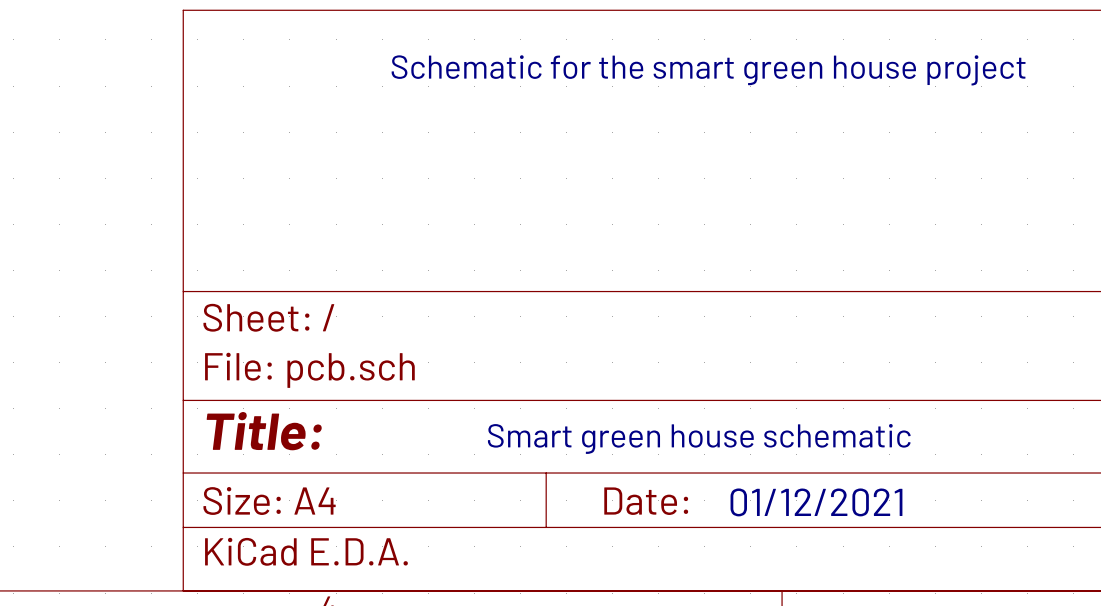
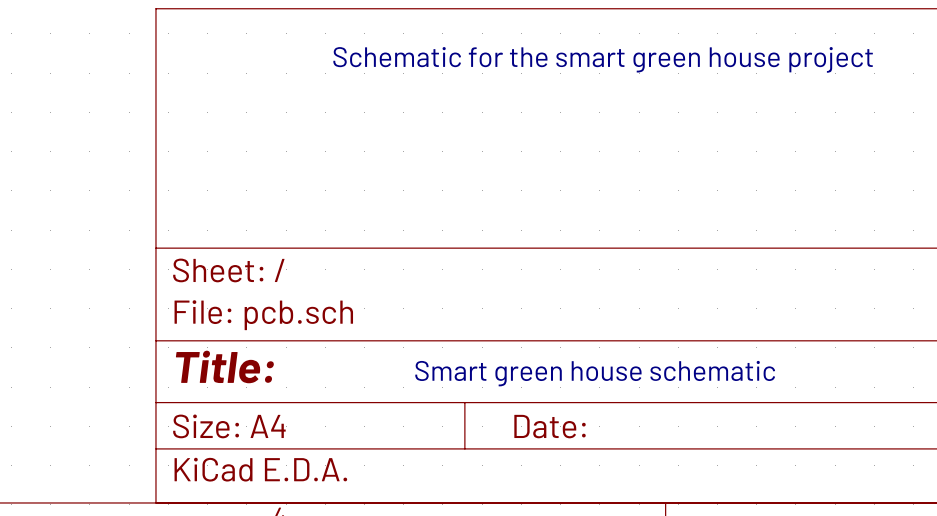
text: 01/12/2021 (816, 502) -> none

